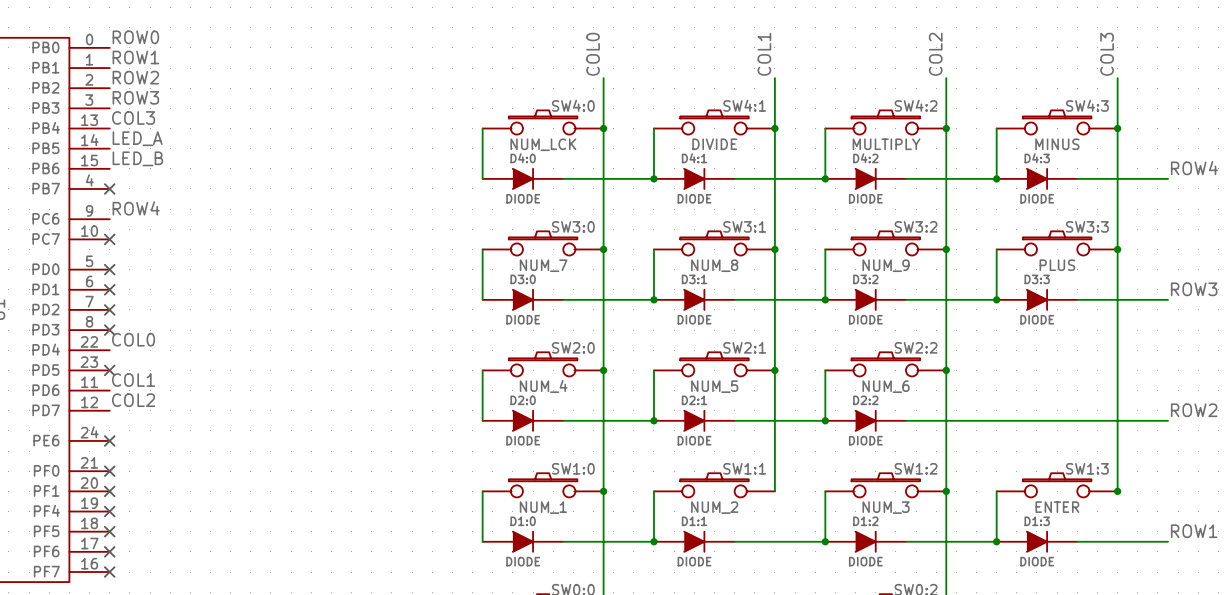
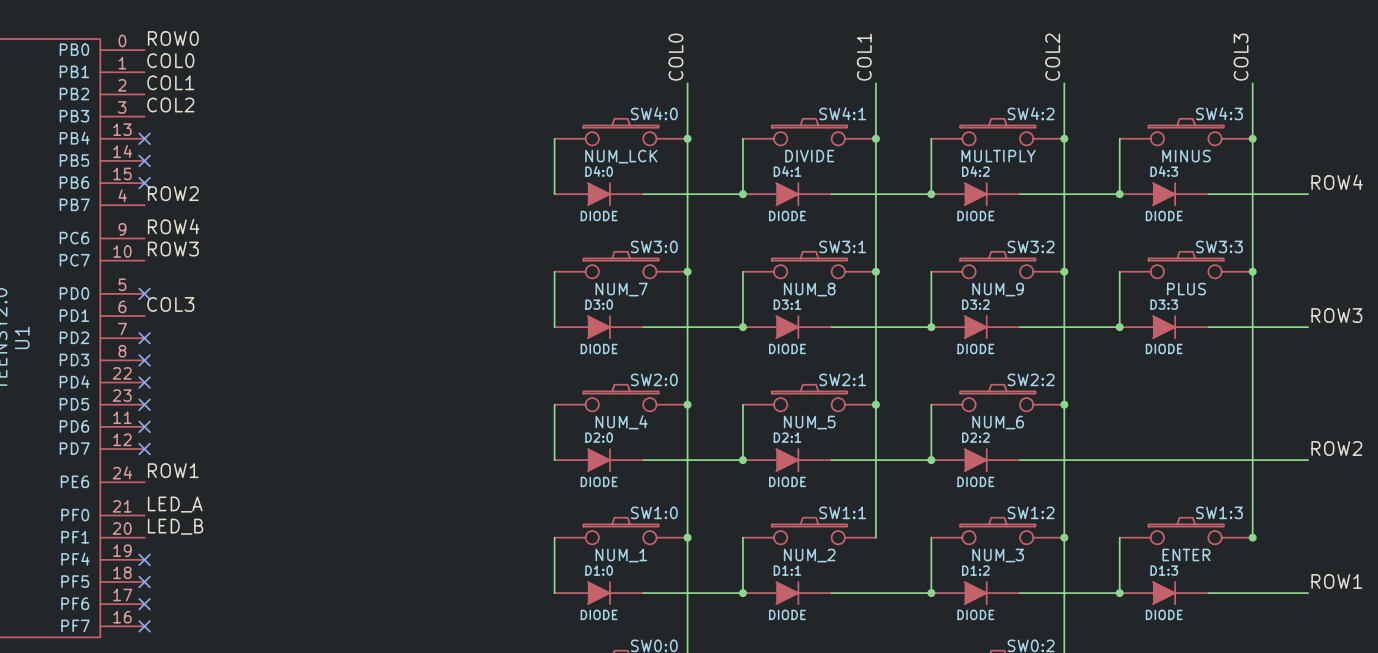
label: ROW1 (135, 57) -> COL0 (170, 60)
label: ROW2 (135, 77) -> COL1 (170, 82)
label: ROW3 (135, 97) -> COL2 (170, 105)
label position: COL3 (133, 117) -> COL3 (170, 304)
no-connect mark: none -> (144, 138)
label: LED_A (137, 138) -> none
no-connect mark: none -> (144, 160)
label: LED_B (137, 158) -> none
no-connect mark: none -> (144, 183)
label: none -> ROW2 (173, 193)
no-connect mark: (109, 188) -> none
label: none -> ROW3 (173, 249)
no-connect mark: (109, 239) -> none
no-connect mark: (109, 289) -> none
label: COL0 (133, 339) -> none
no-connect mark: none -> (144, 382)
label: COL1 (133, 380) -> none
no-connect mark: none -> (144, 426)
label: COL2 (133, 400) -> none
no-connect mark: none -> (144, 449)
label: none -> ROW1 (173, 470)
no-connect mark: (109, 440) -> none
label: none -> LED_A (175, 504)
no-connect mark: (109, 471) -> none
label: none -> LED_B (175, 526)
no-connect mark: (109, 491) -> none

